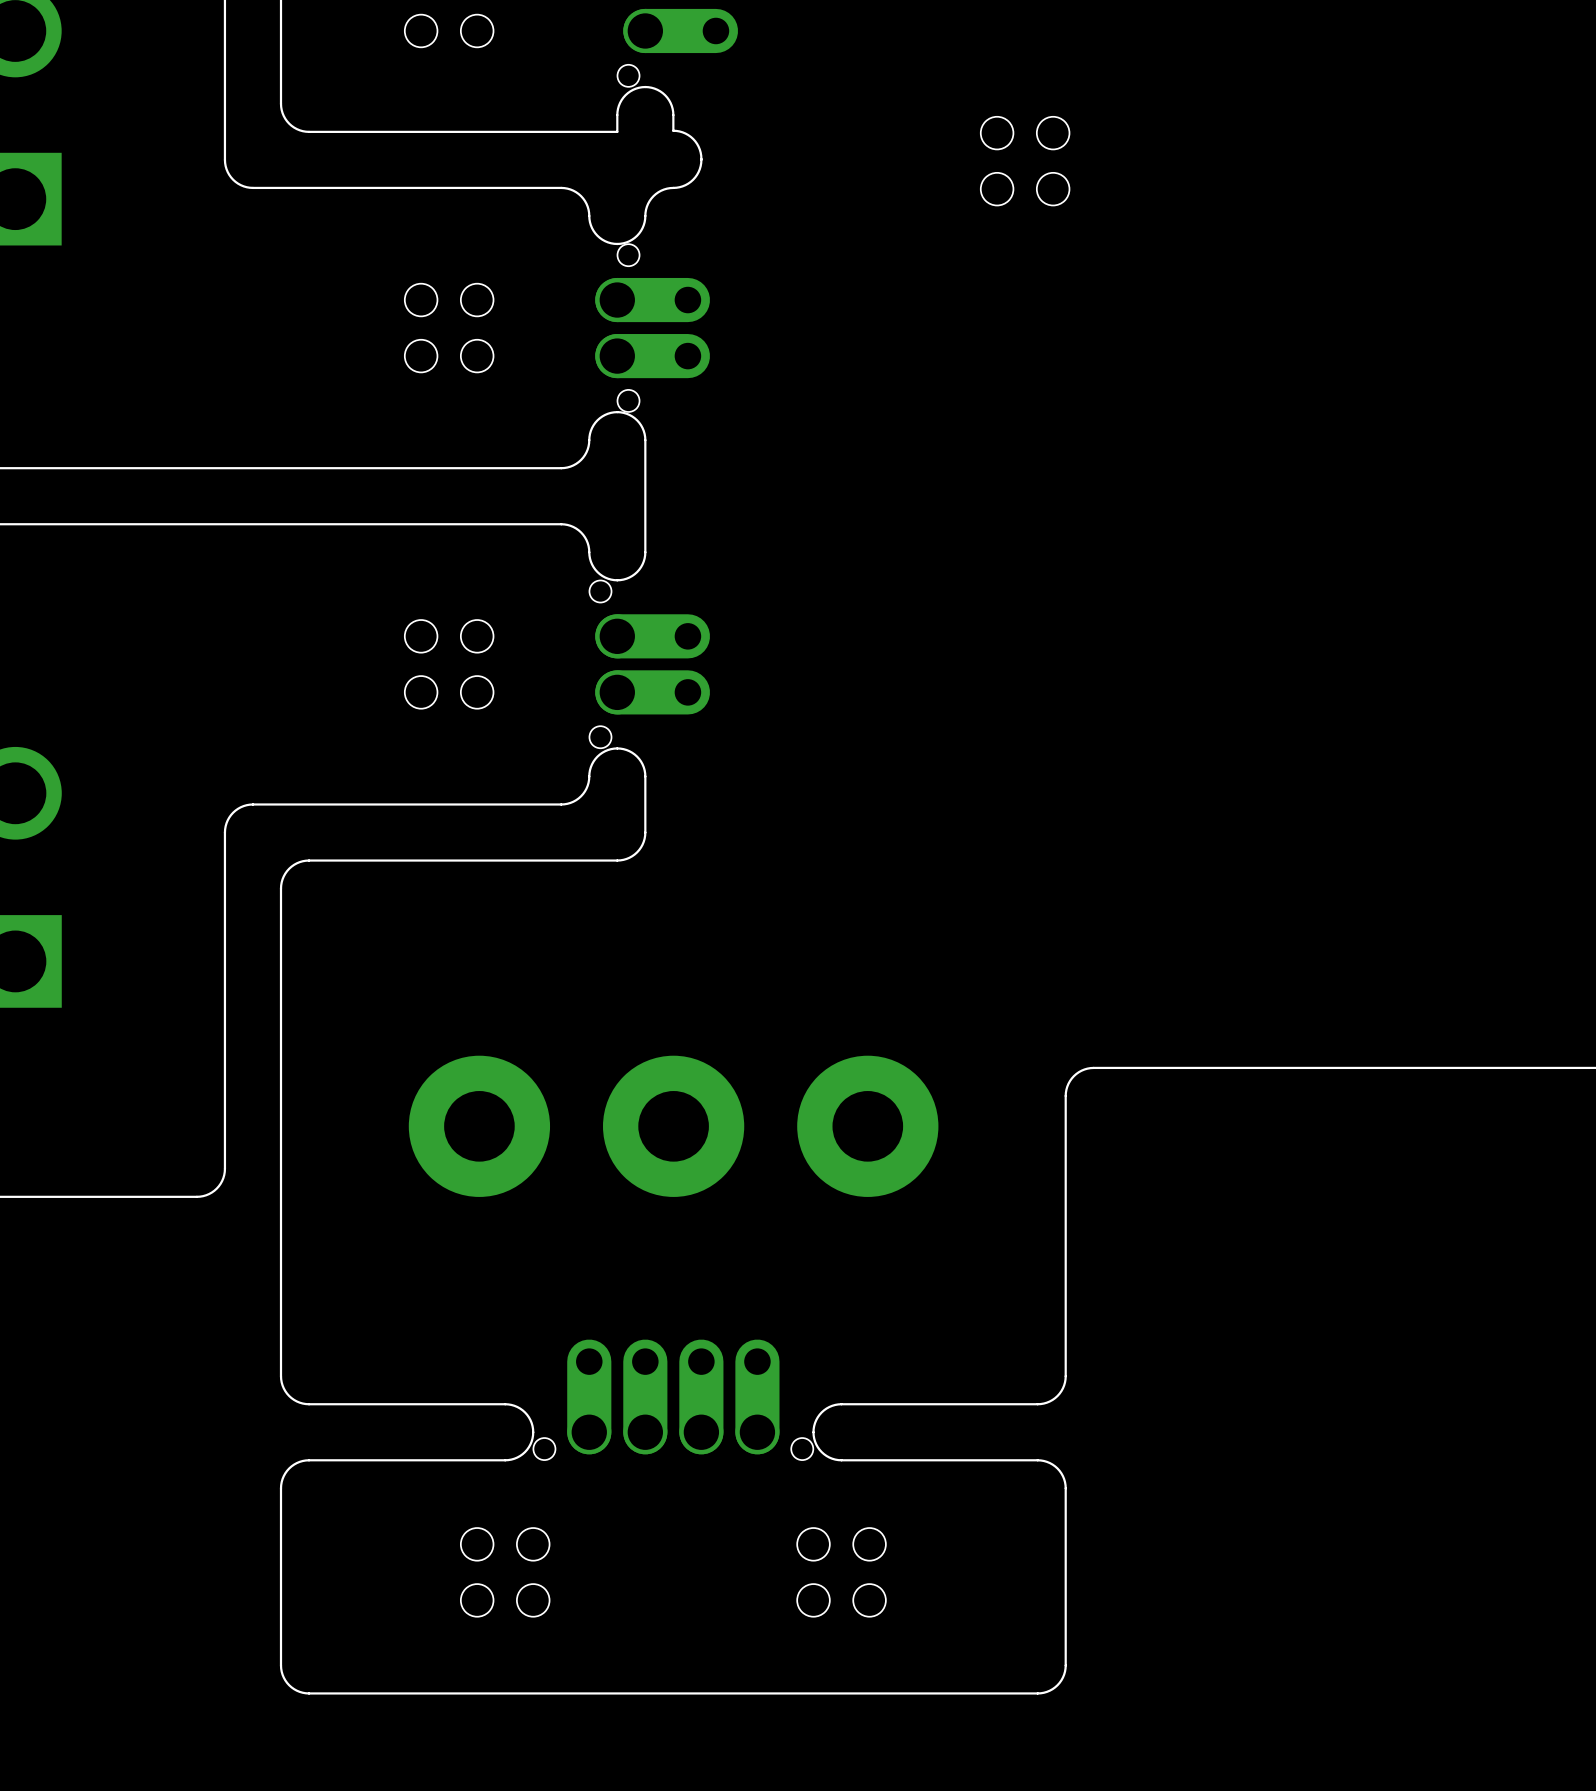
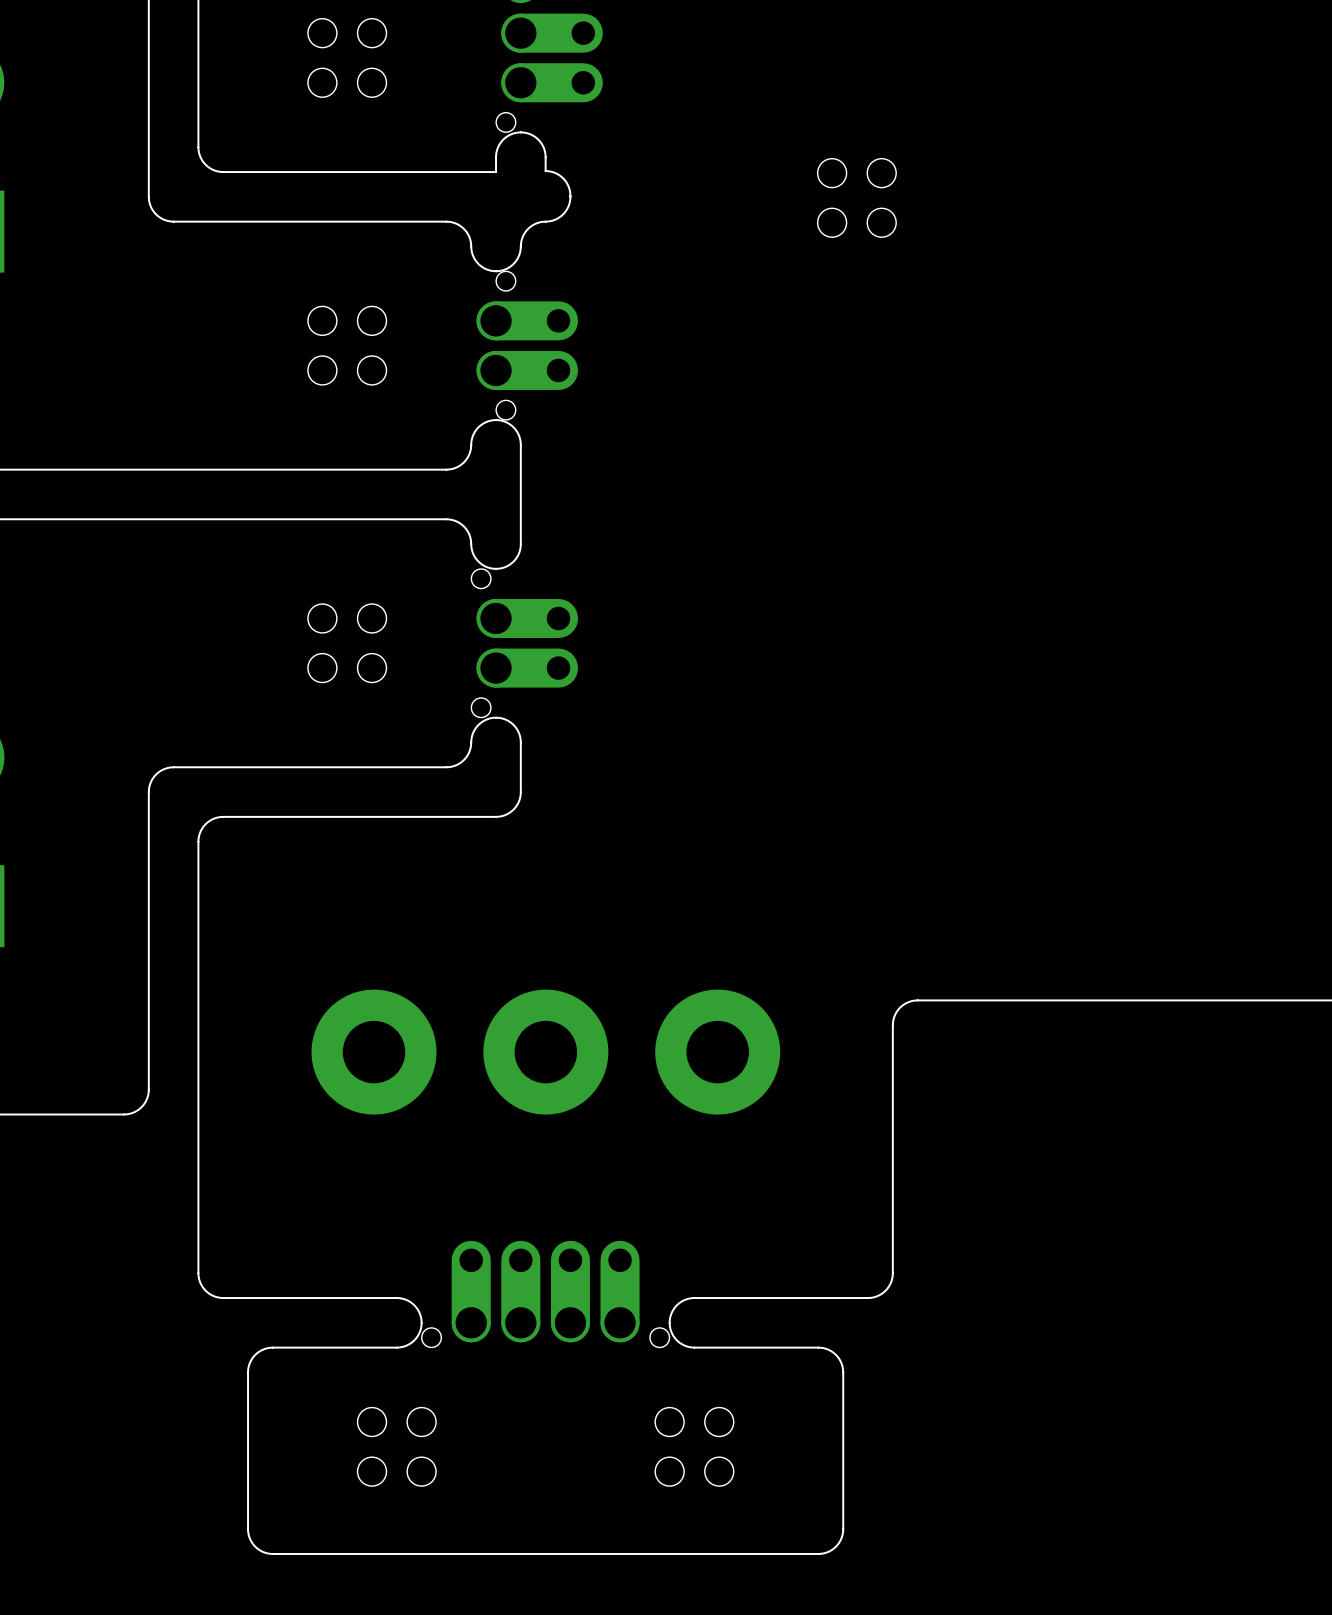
board edge: (365, 1460) (299, 1461) (287, 1470) (282, 1479) (281, 1488) (282, 1674) (289, 1685) (302, 1692) (365, 1693) -> (272, 1347) (264, 1349) (255, 1354) (250, 1361) (248, 1372) (248, 1531) (255, 1546) (262, 1551) (272, 1553)
board edge: (981, 1460) (1046, 1461) (1055, 1466) (1061, 1473) (1065, 1488) (1064, 1674) (1055, 1687) (1043, 1692) (981, 1693) -> (818, 1347) (829, 1350) (835, 1354) (841, 1364) (843, 1372) (843, 1531) (835, 1546) (826, 1552) (818, 1553)

